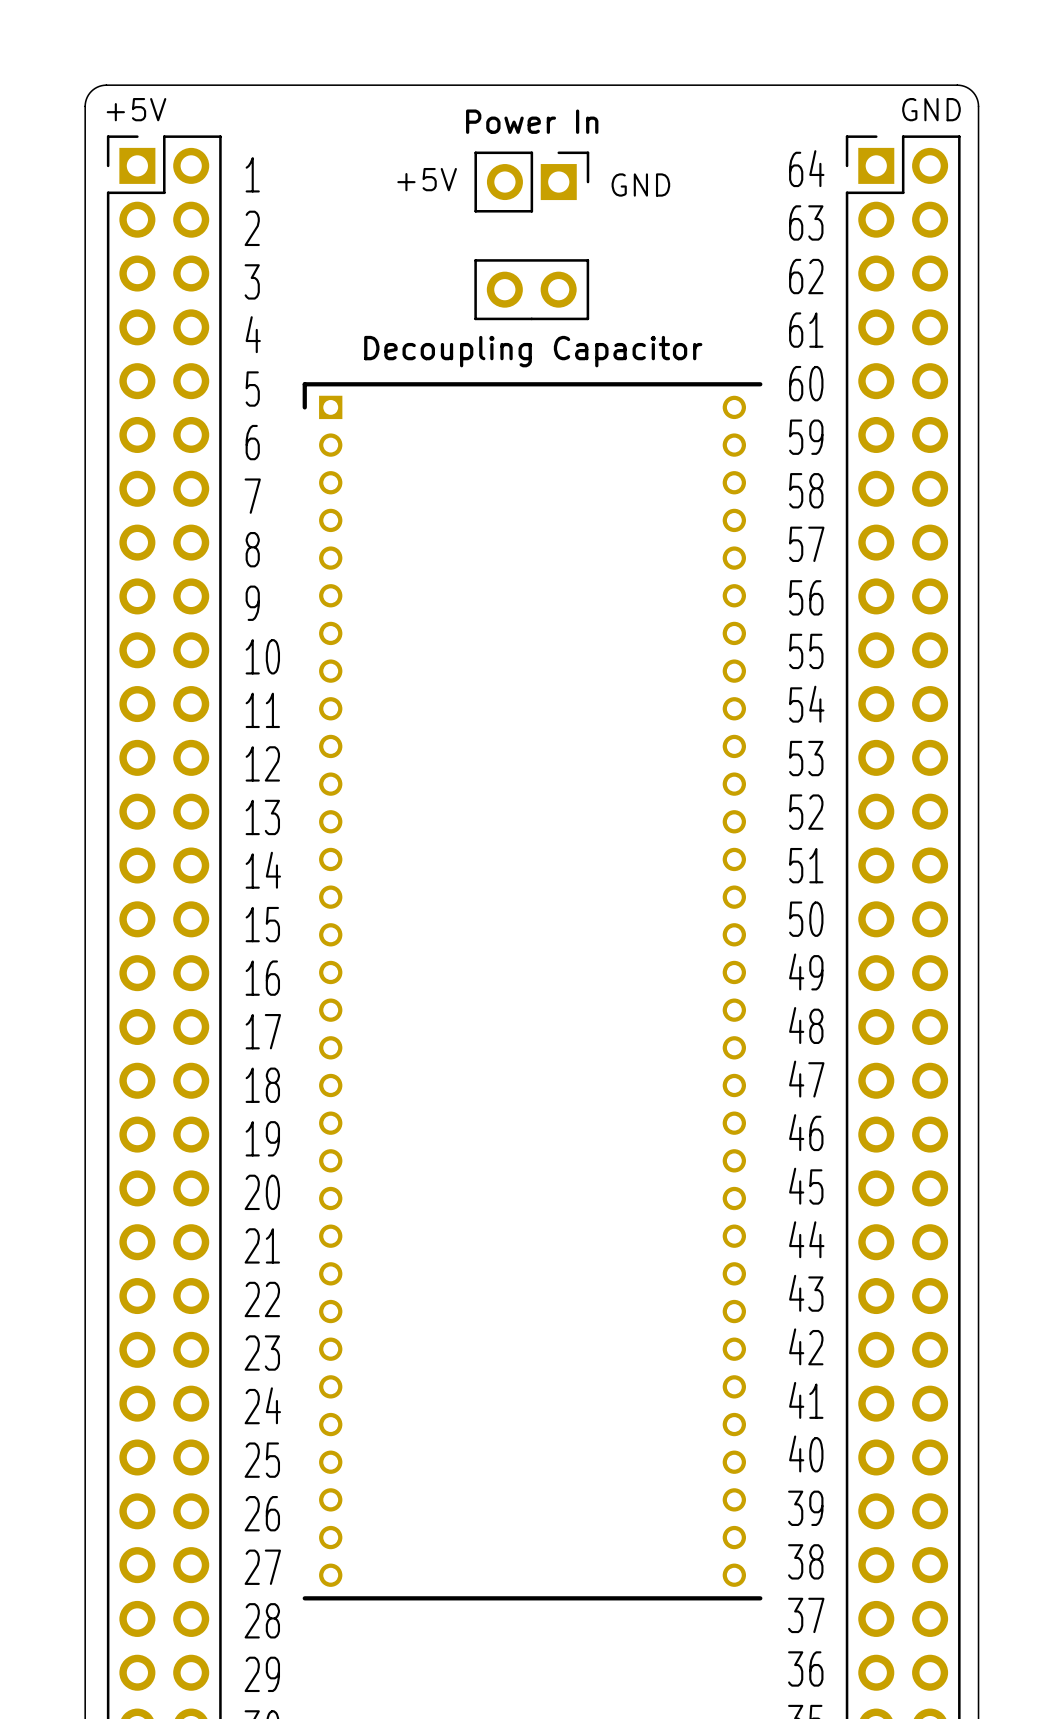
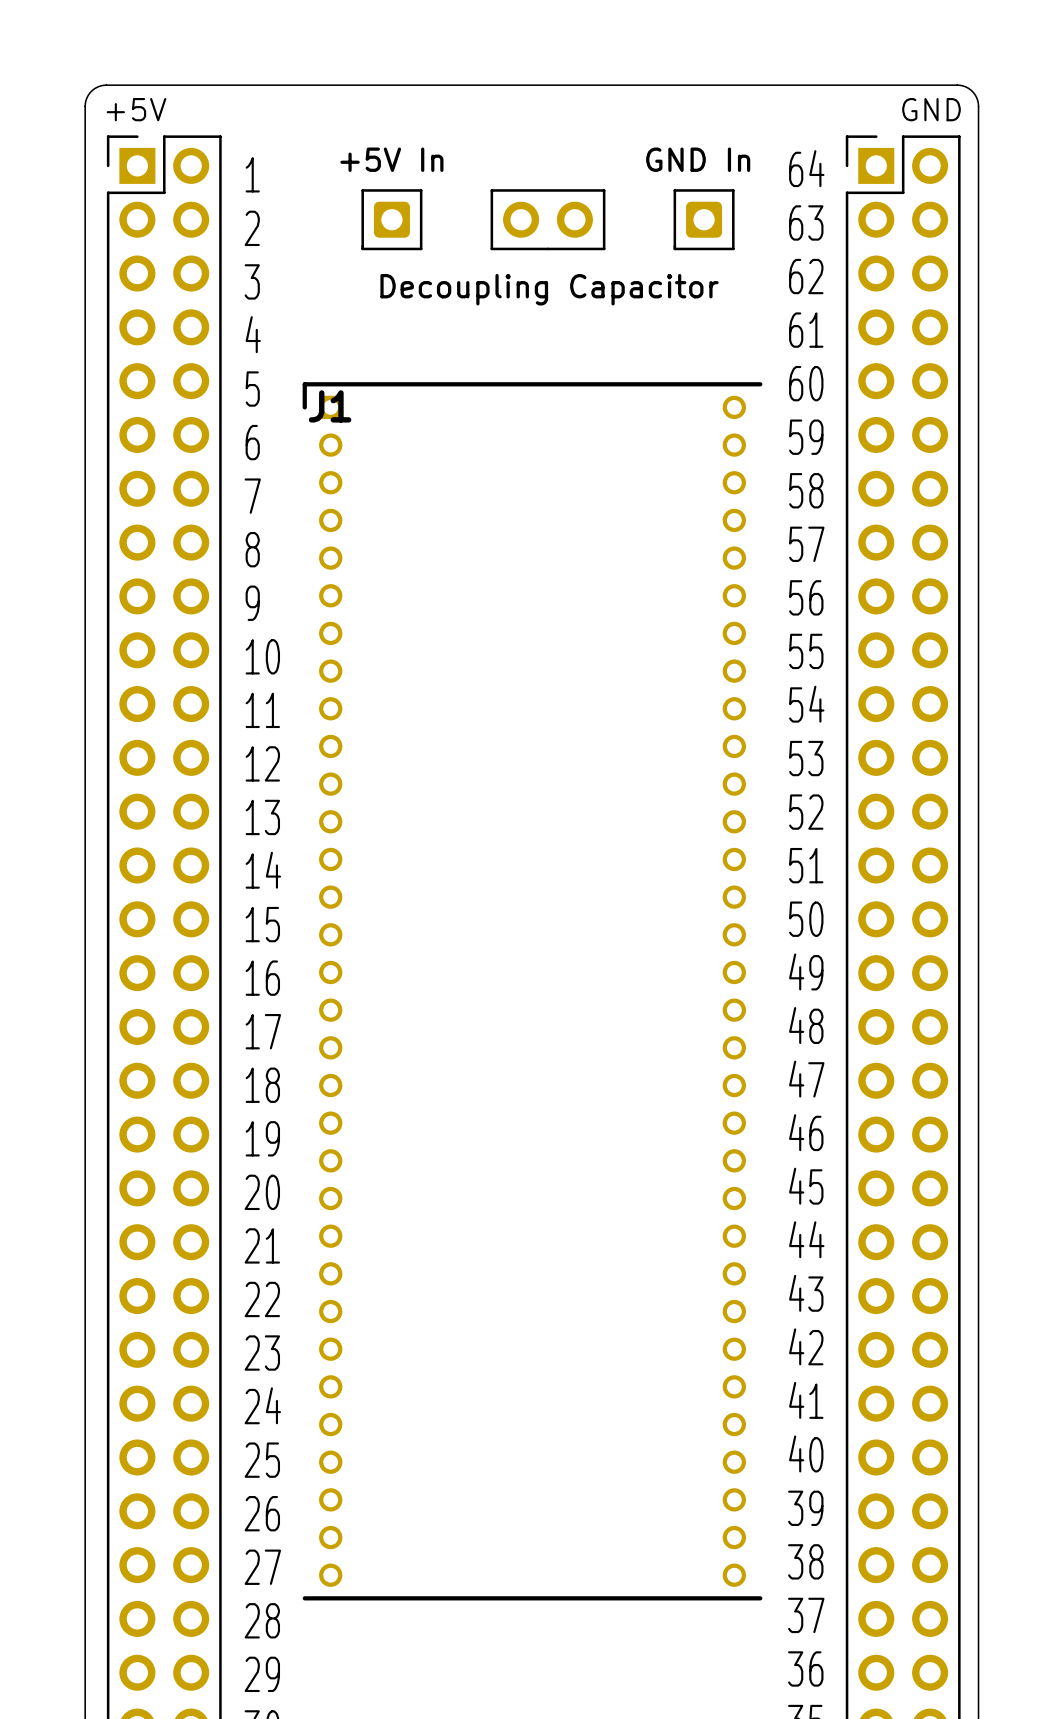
text: +5V (427, 179) -> none
part: Power In (531, 182) -> none
text: GND (640, 185) -> none
part: none -> +5V In (391, 219)
part: none -> GND In (704, 219)
part position: (531, 289) -> (548, 219)
part value position: Decoupling Capacitor (533, 351) -> Decoupling Capacitor (549, 289)
J1 name: none -> J1 (330, 406)

